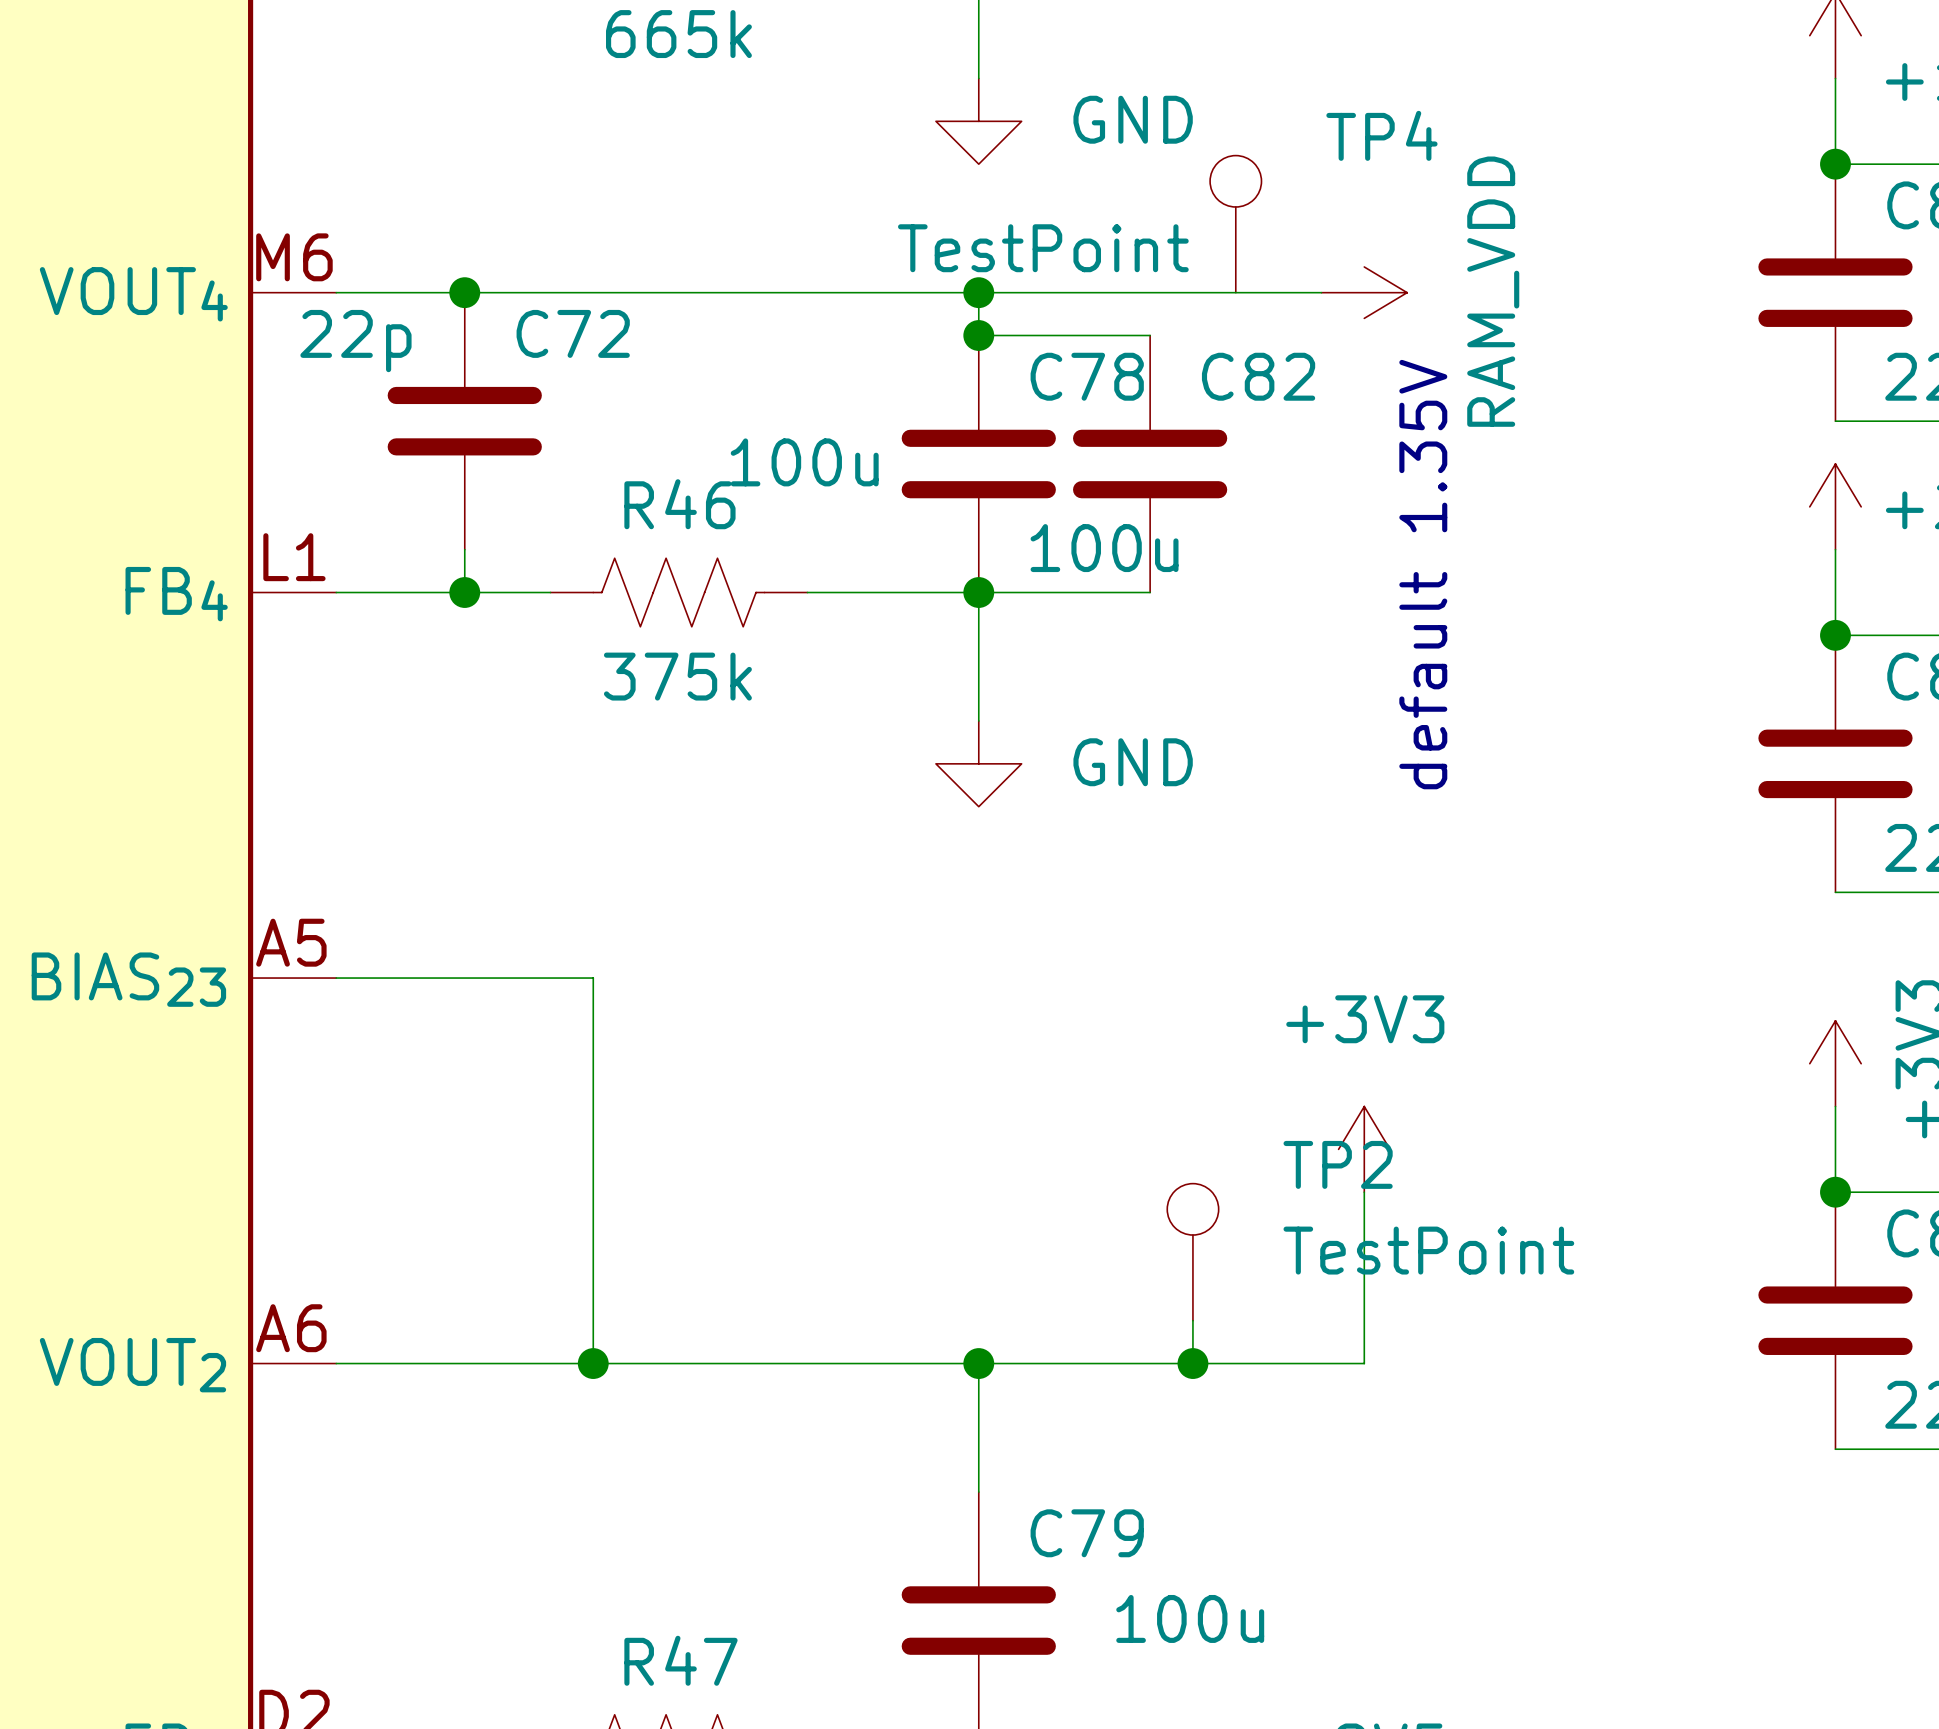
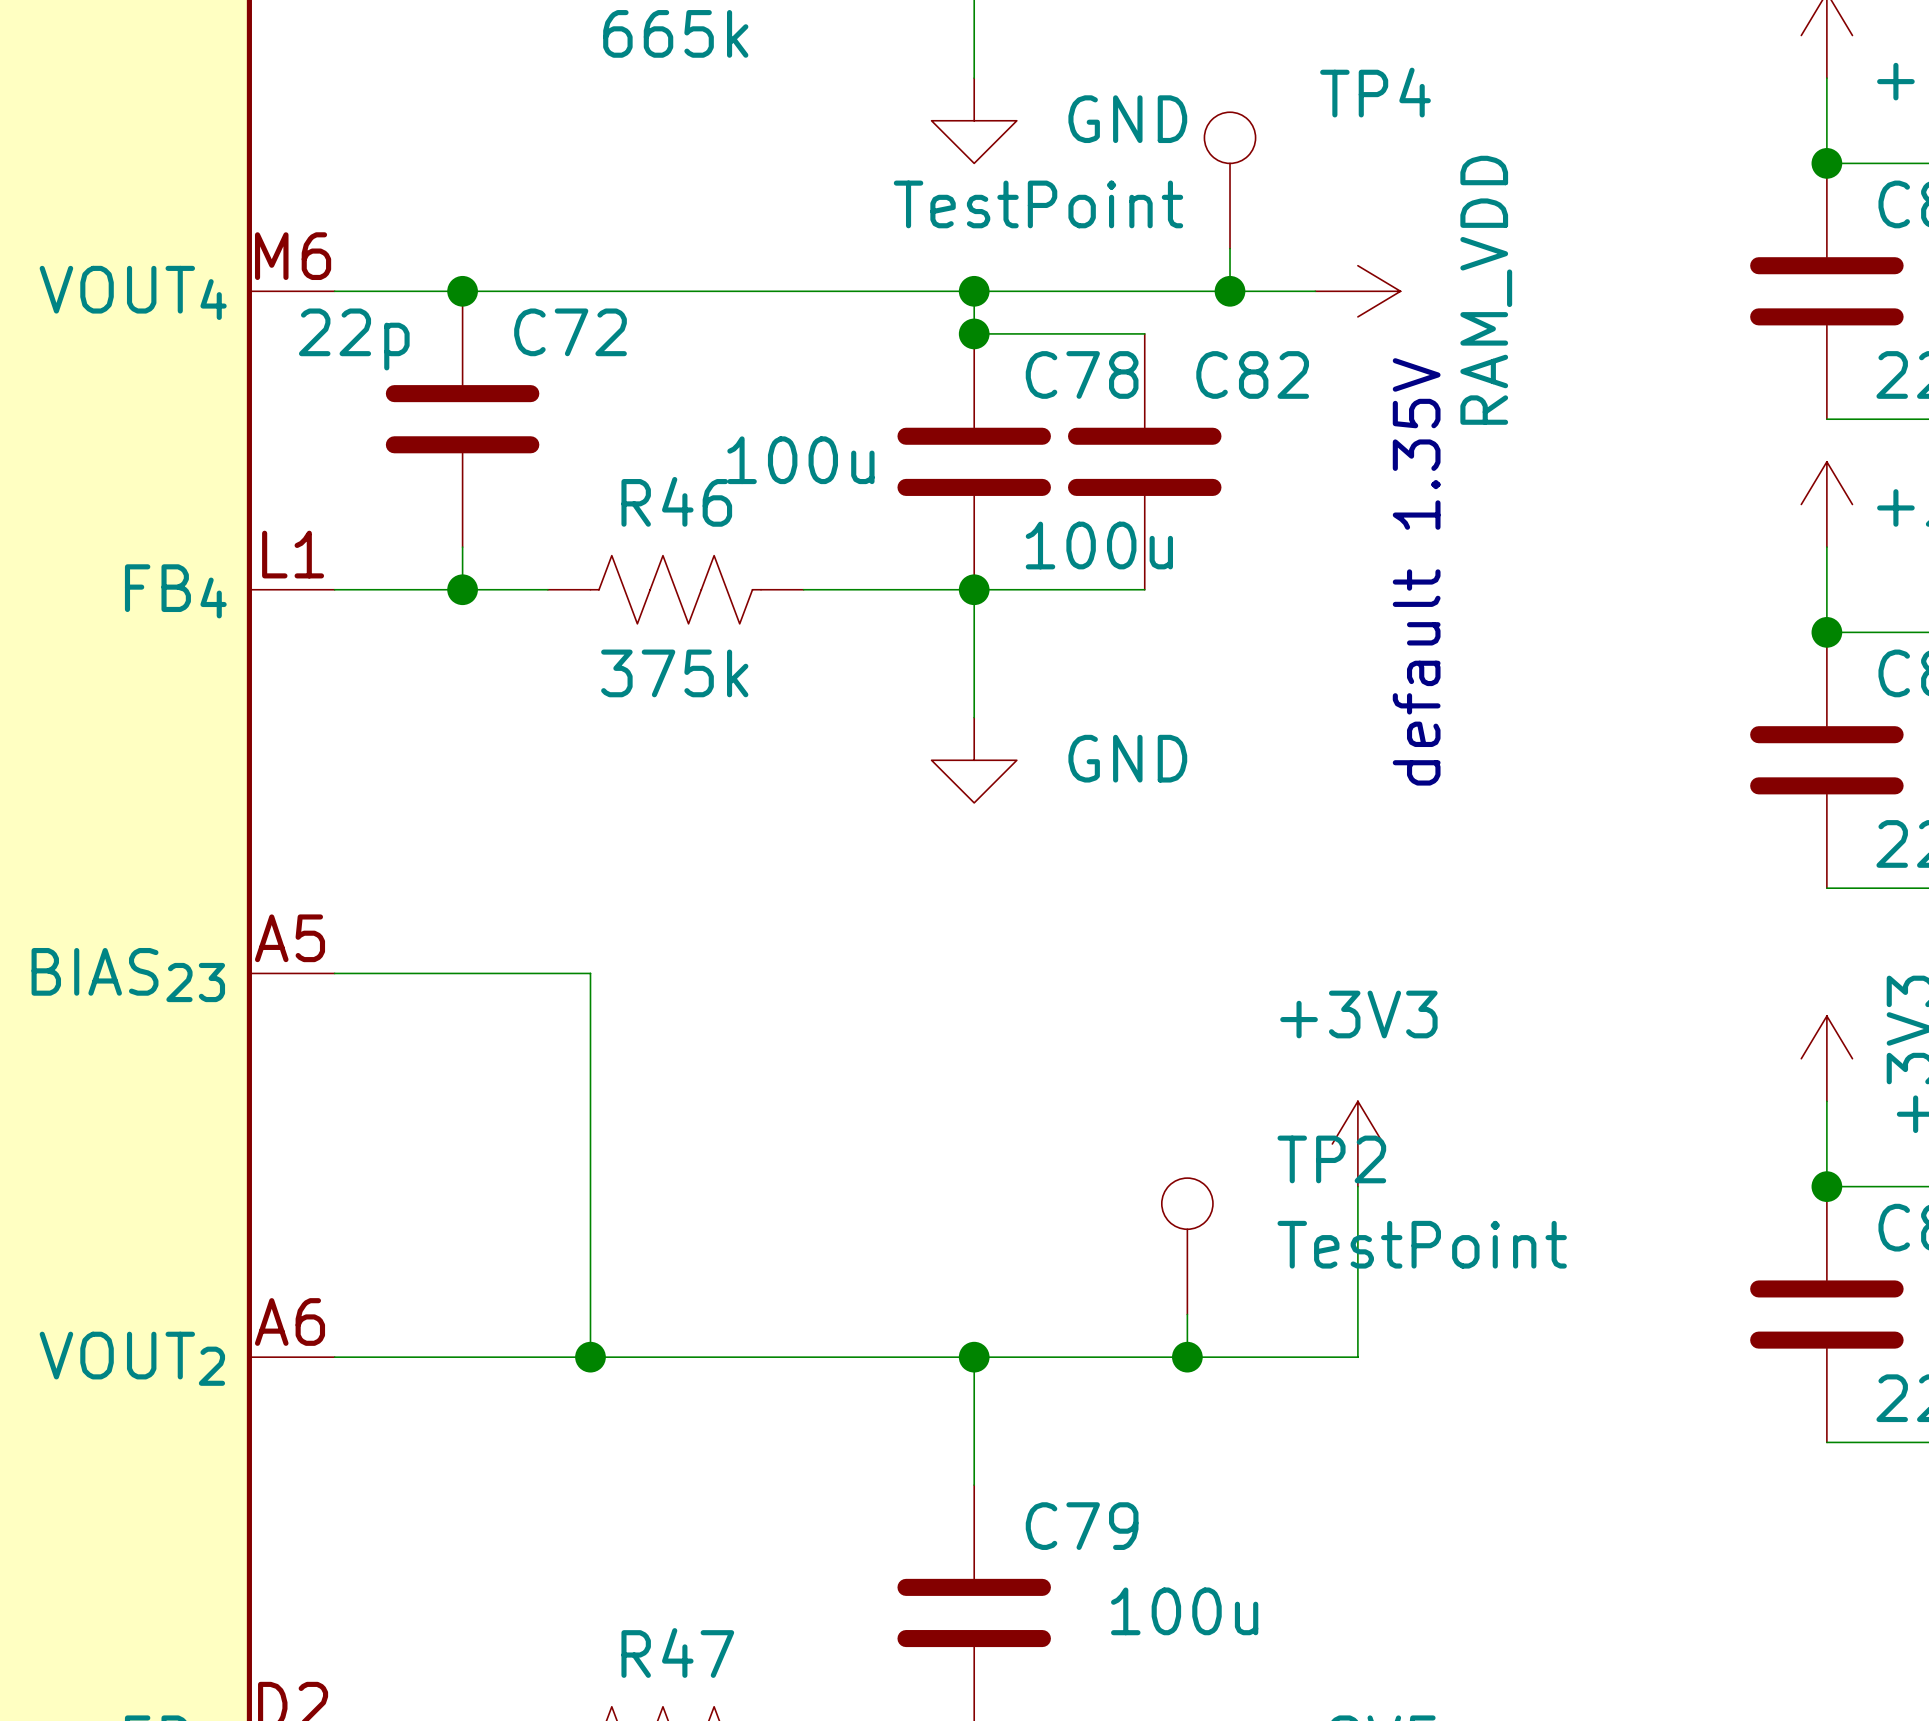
TP4 position: (1235, 224) -> (1230, 180)
junction: none -> (1230, 291)

